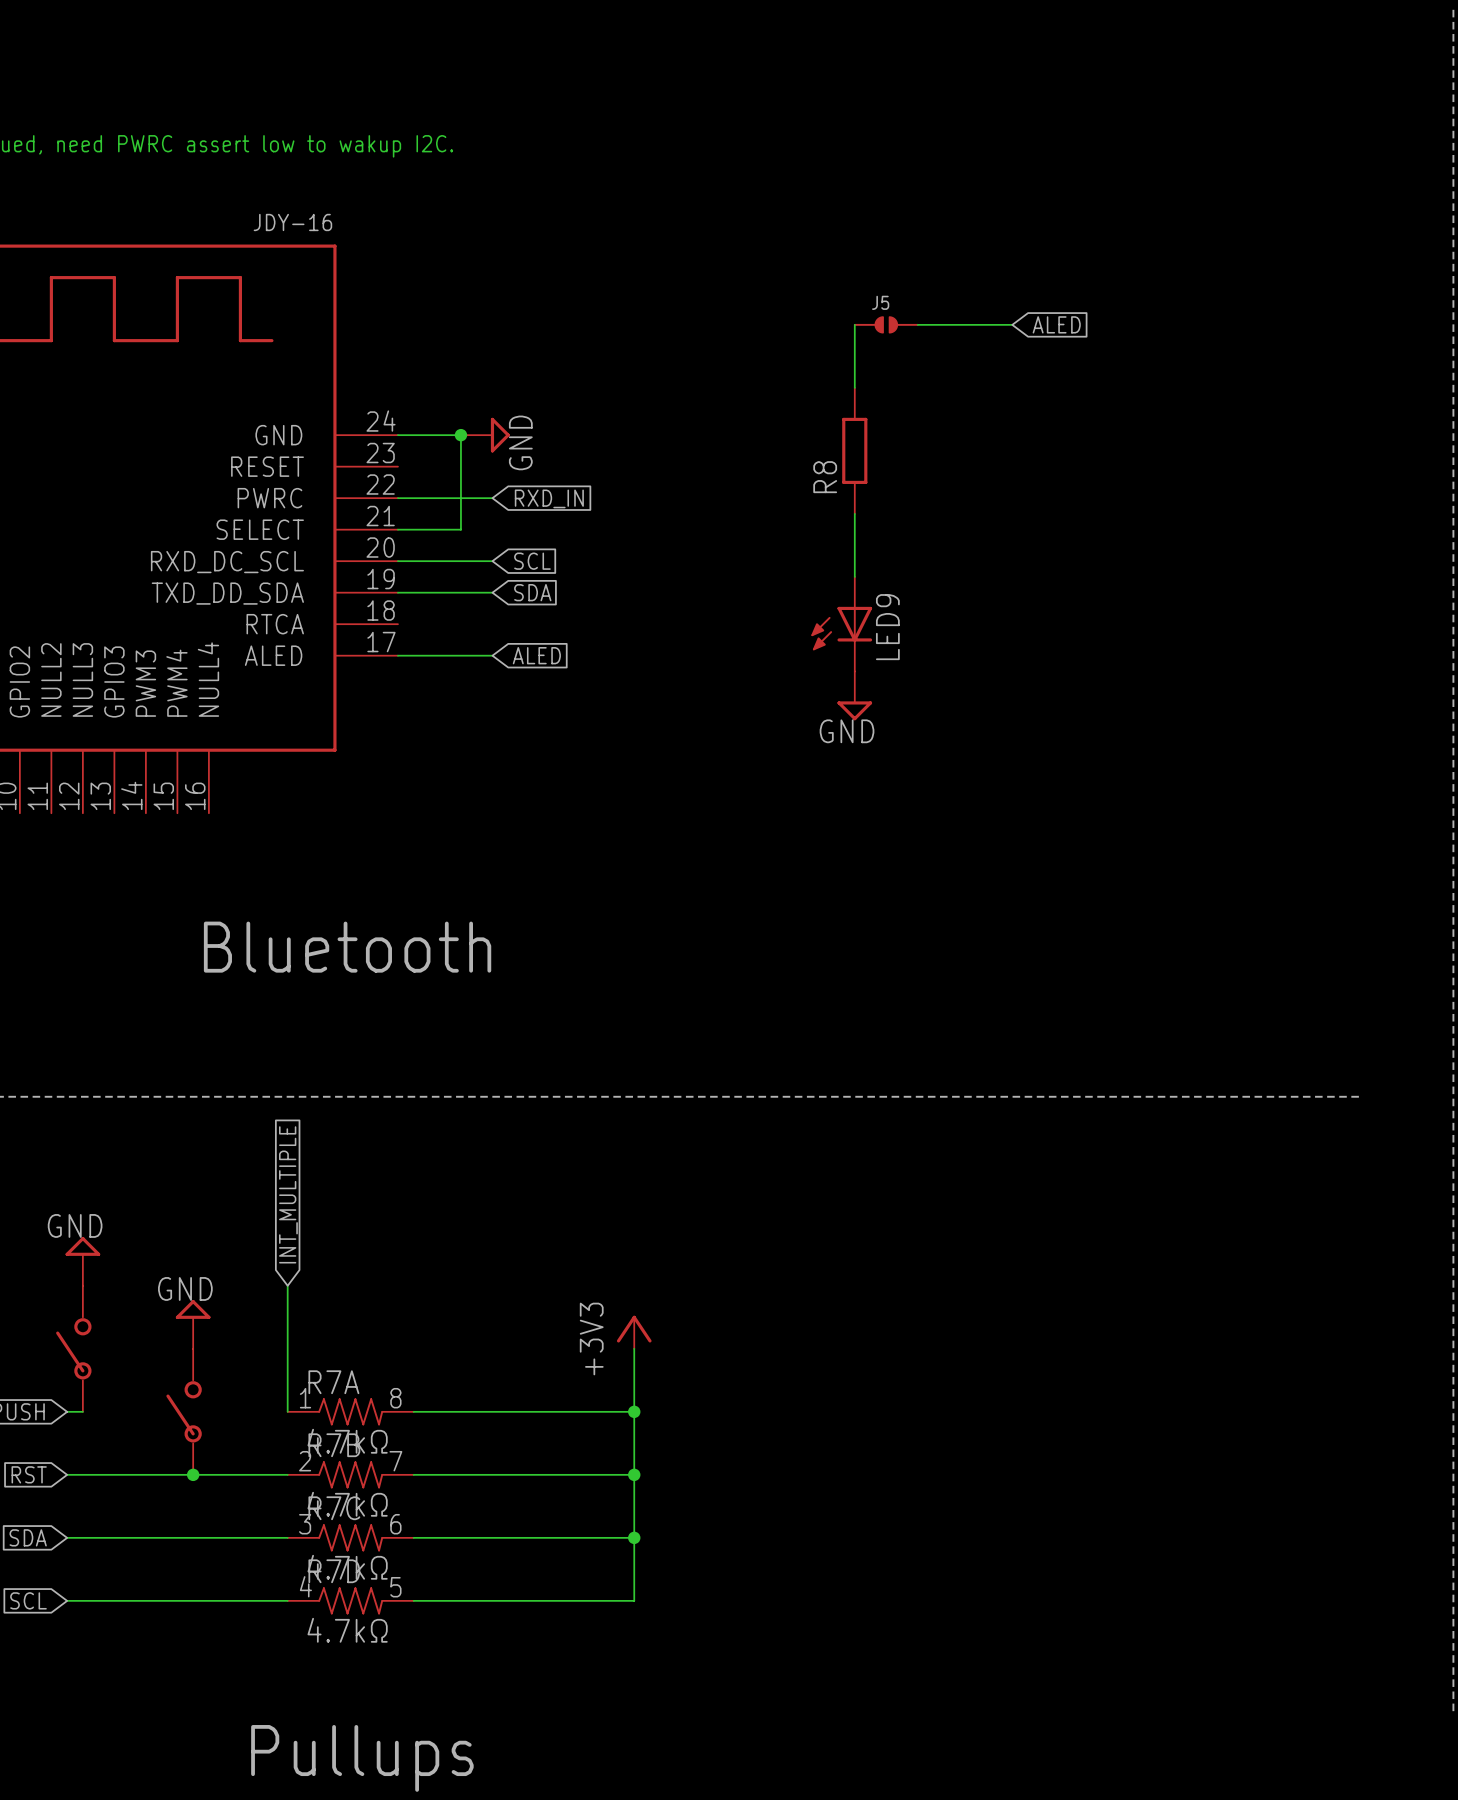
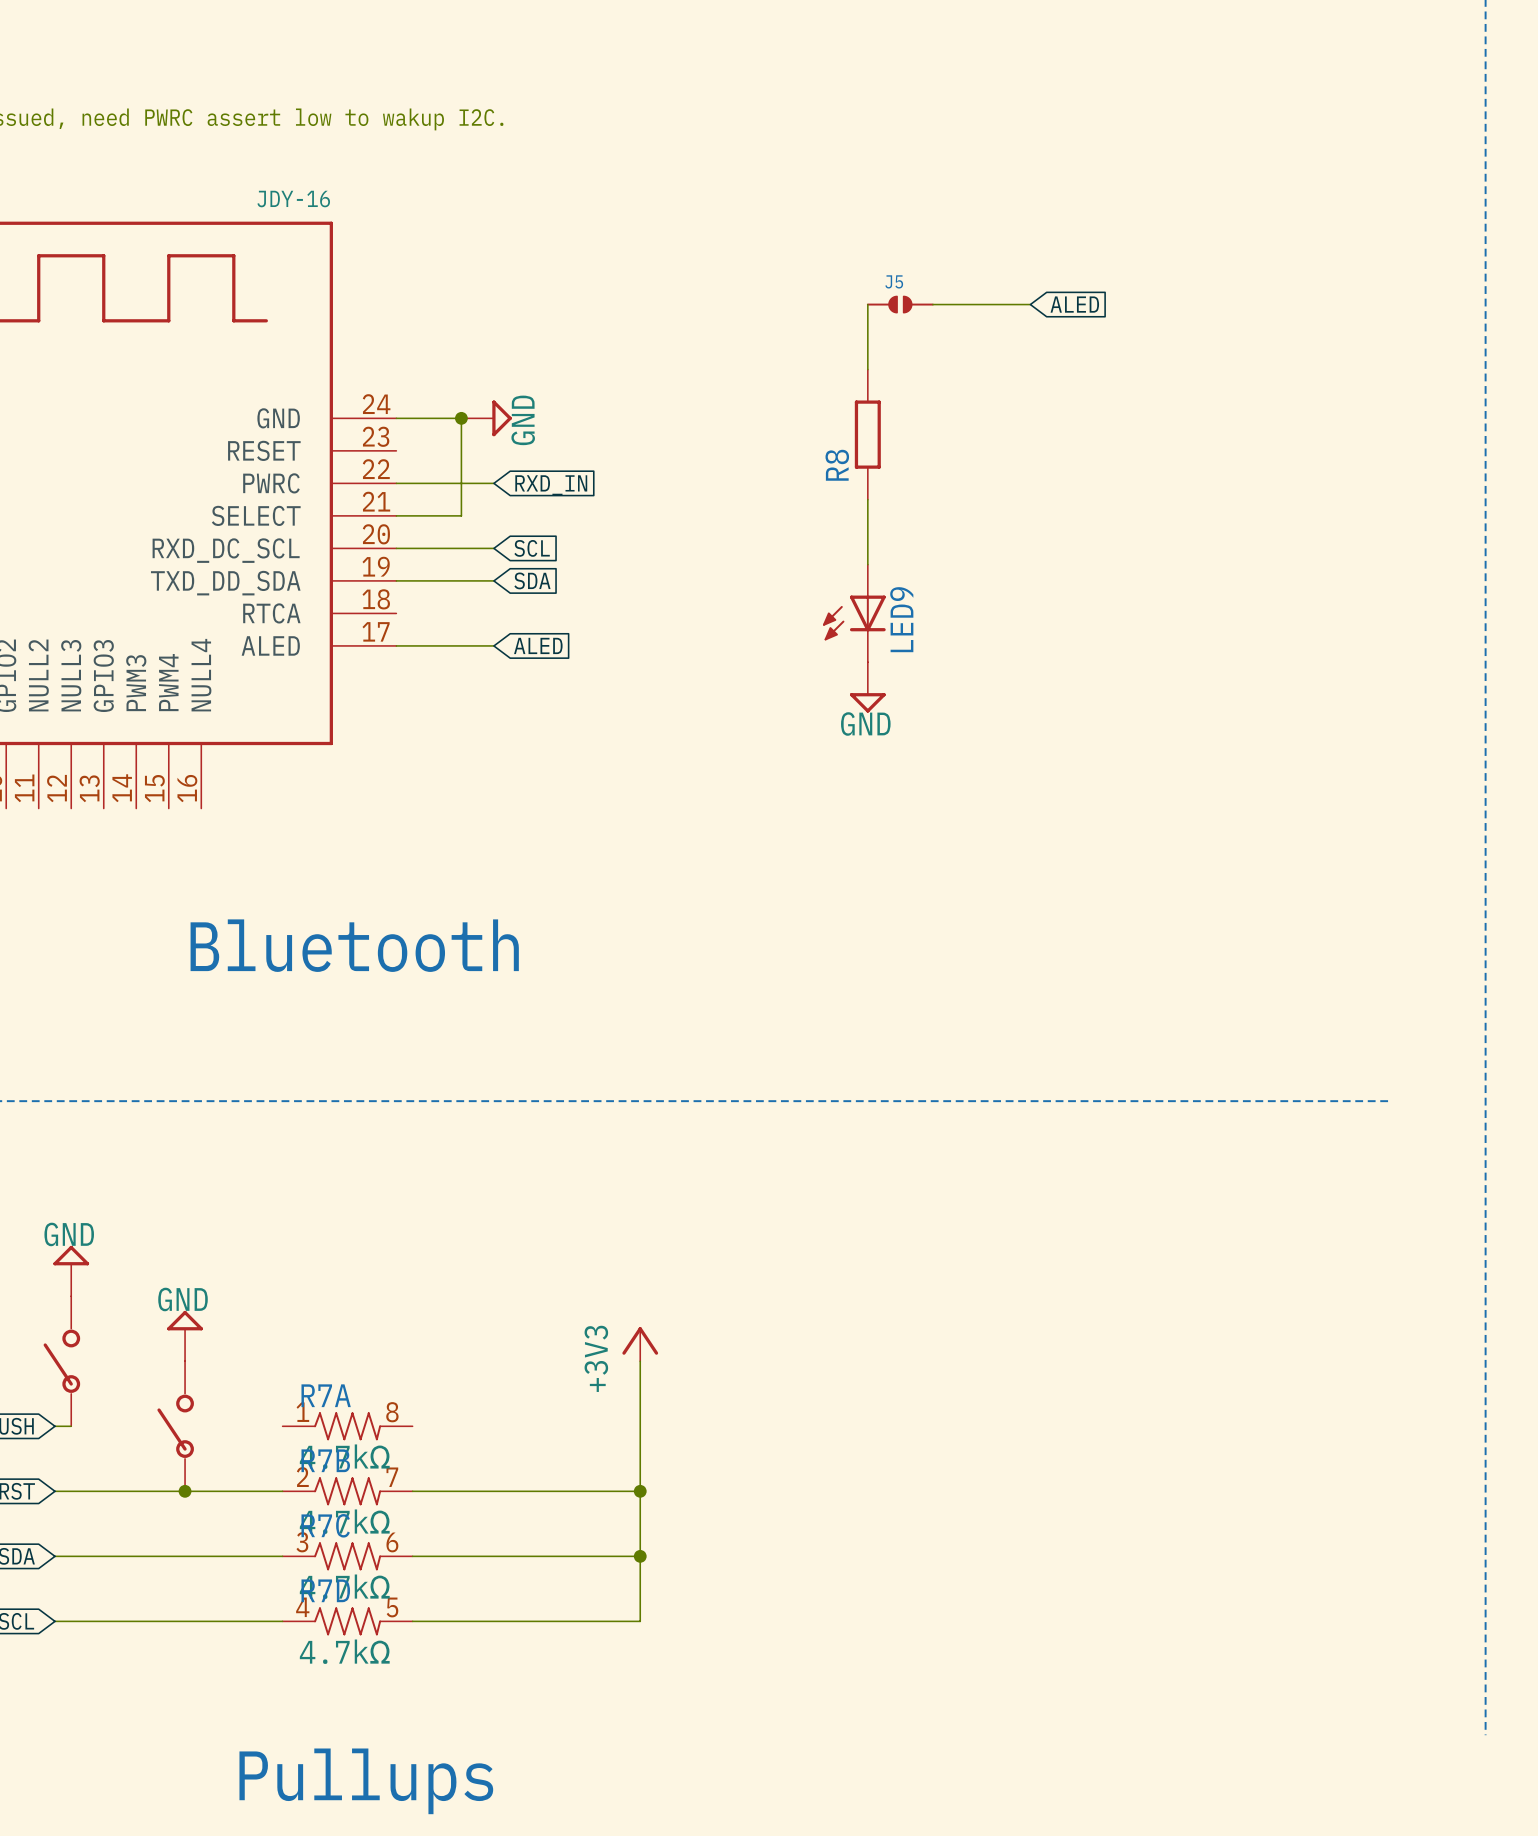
global label: INT_MULTIPLE (288, 1194) -> none
wire: (287, 1285) (287, 1411) -> none
wire: (413, 1411) (634, 1411) -> none
junction: (634, 1411) -> none

